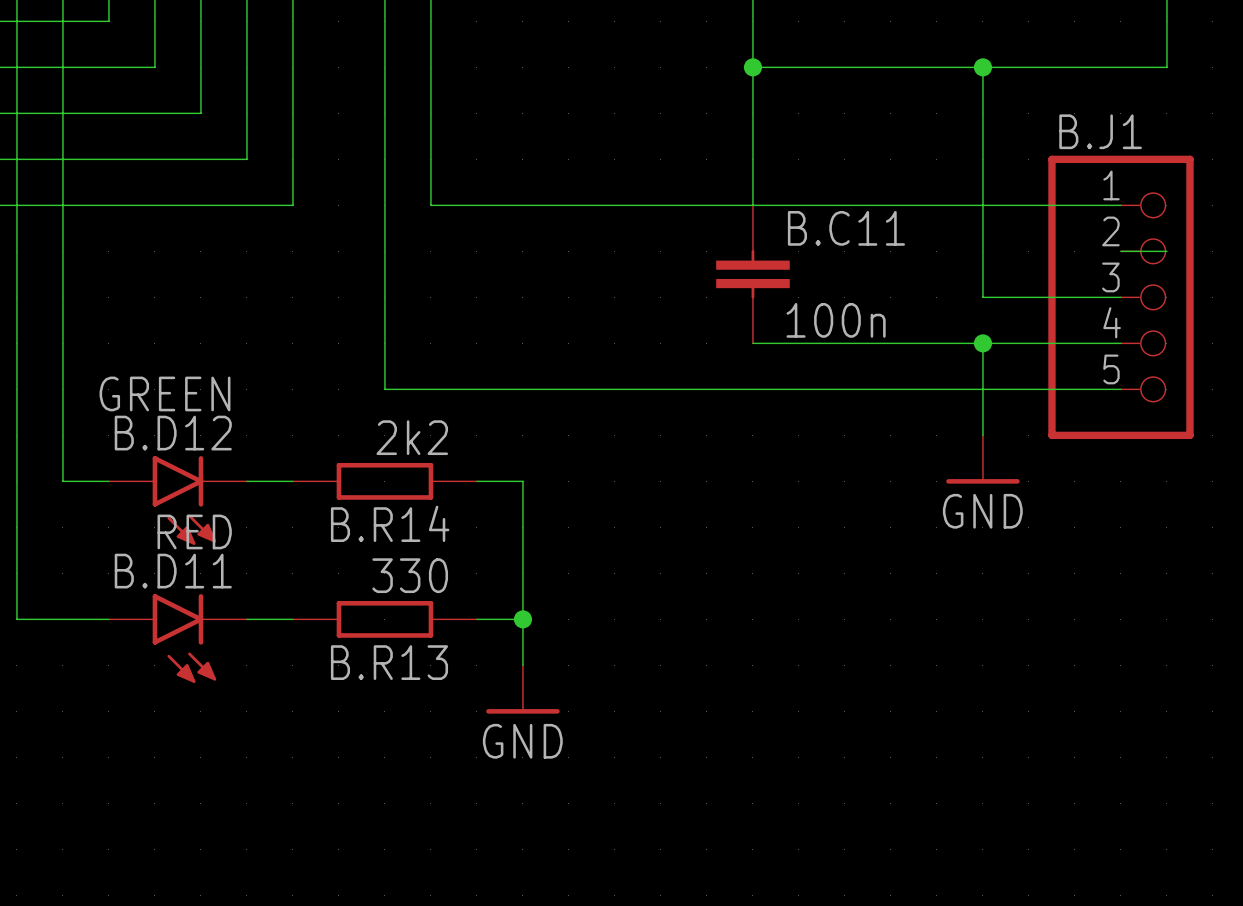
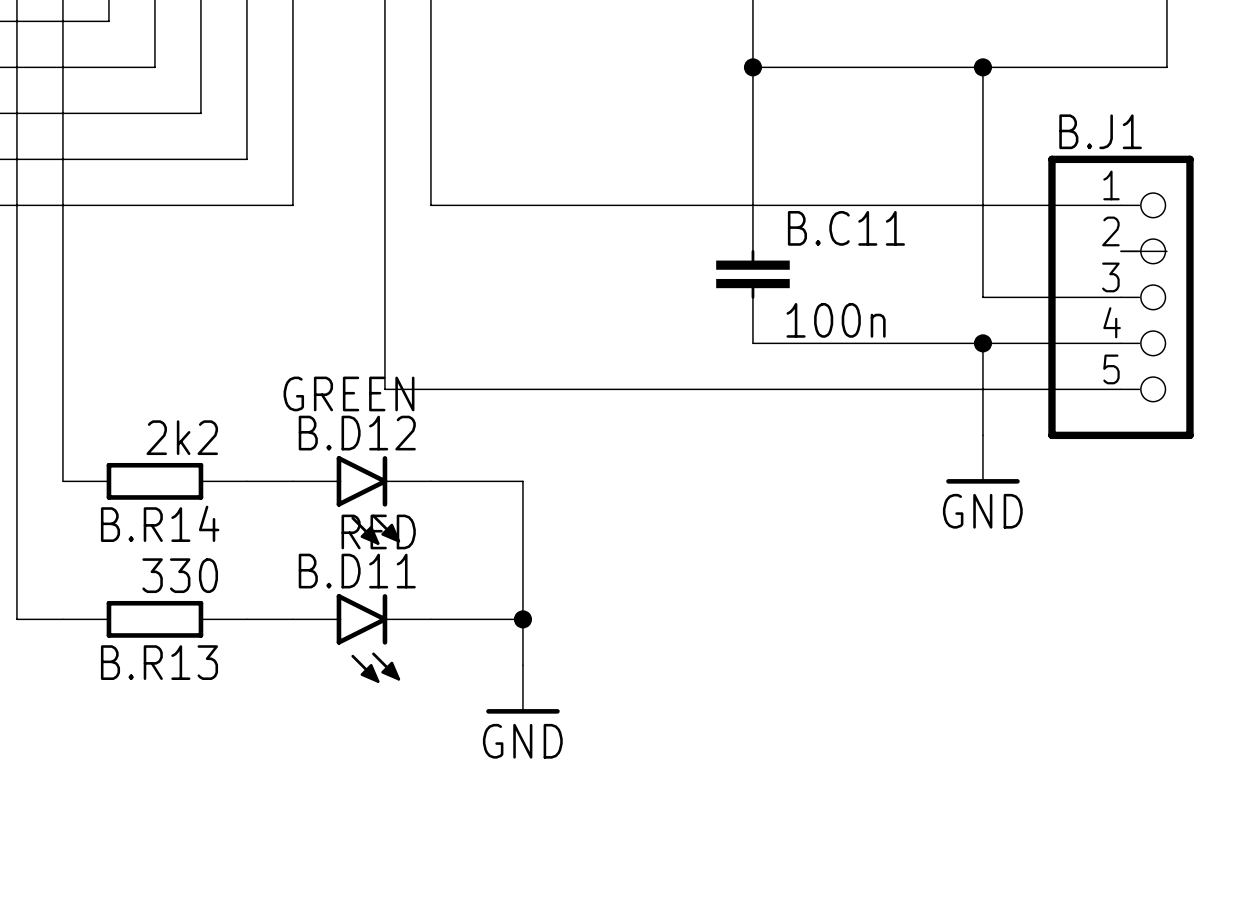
B.R14 position: (384, 481) -> (154, 481)
B.D12 position: (177, 500) -> (361, 500)
B.R13 position: (384, 619) -> (154, 619)
B.D11 position: (177, 638) -> (361, 638)

